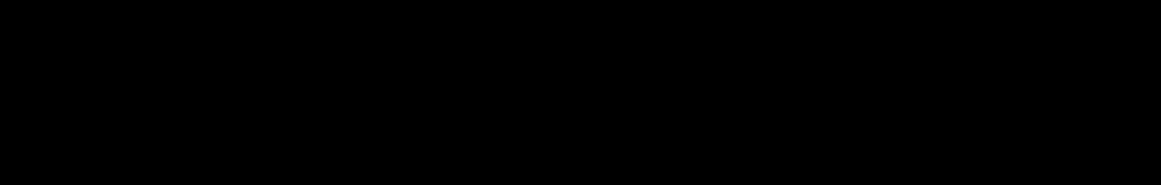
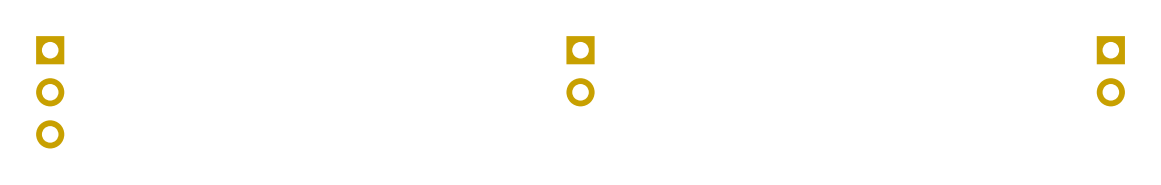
part: none -> (580, 71)
part: none -> (1110, 71)
part: none -> (50, 92)

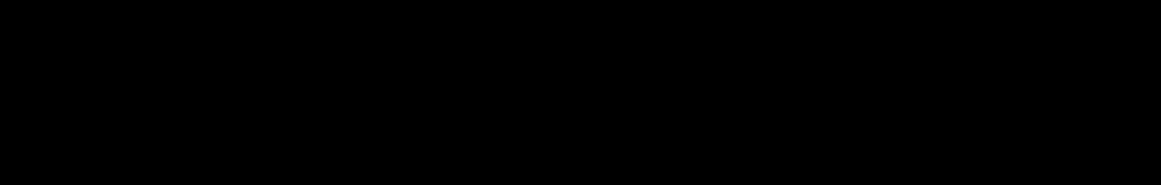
part: (580, 71) -> none
part: (1110, 71) -> none
part: (50, 92) -> none

